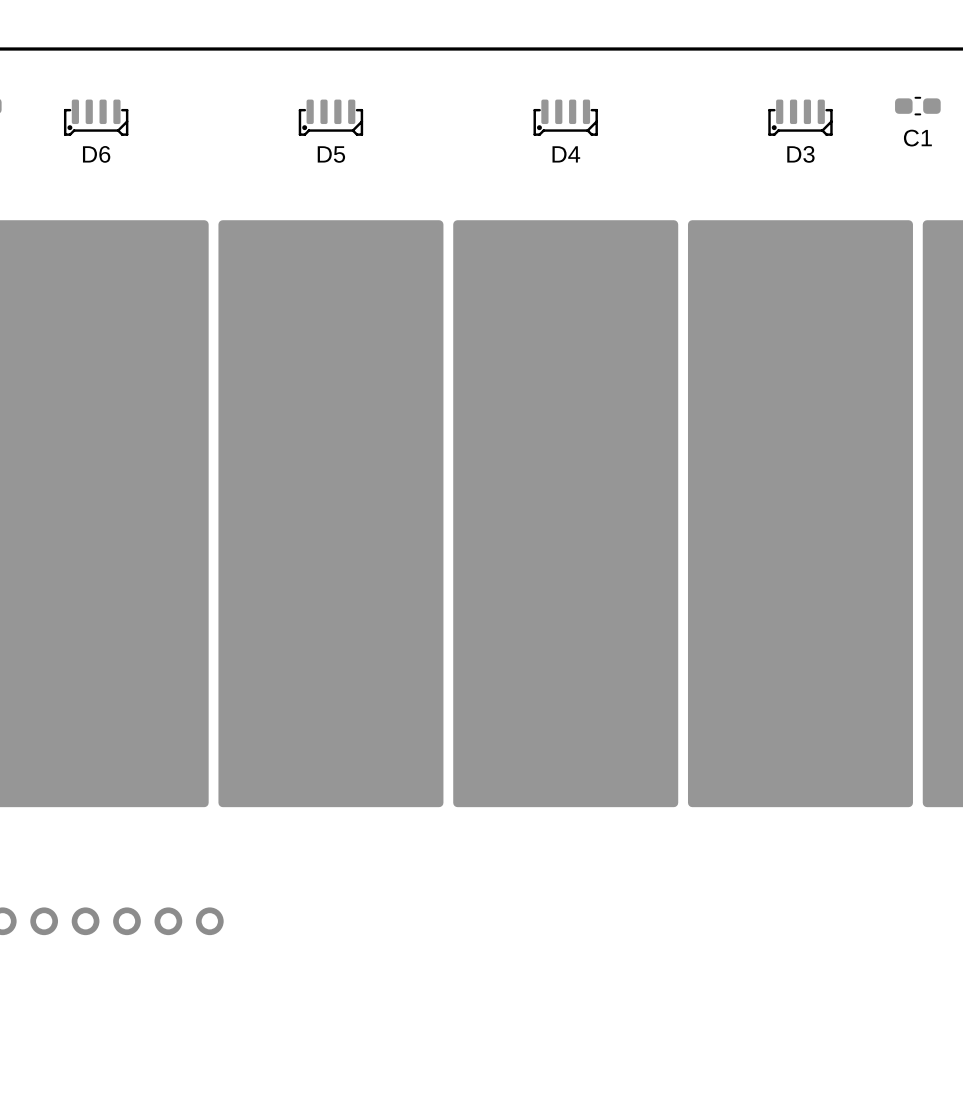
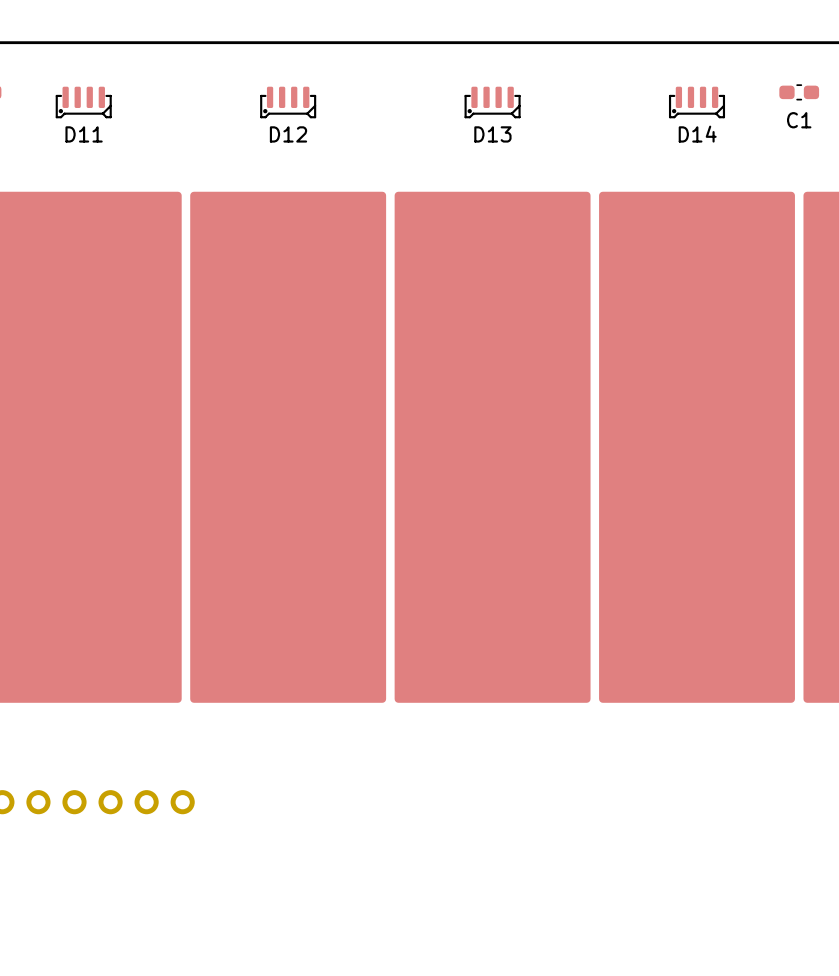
D6 name: D6 (96, 154) -> D11 (84, 134)
D5 name: D5 (331, 154) -> D12 (288, 134)
D4 name: D4 (566, 154) -> D13 (492, 134)
D3 name: D3 (800, 154) -> D14 (697, 134)

